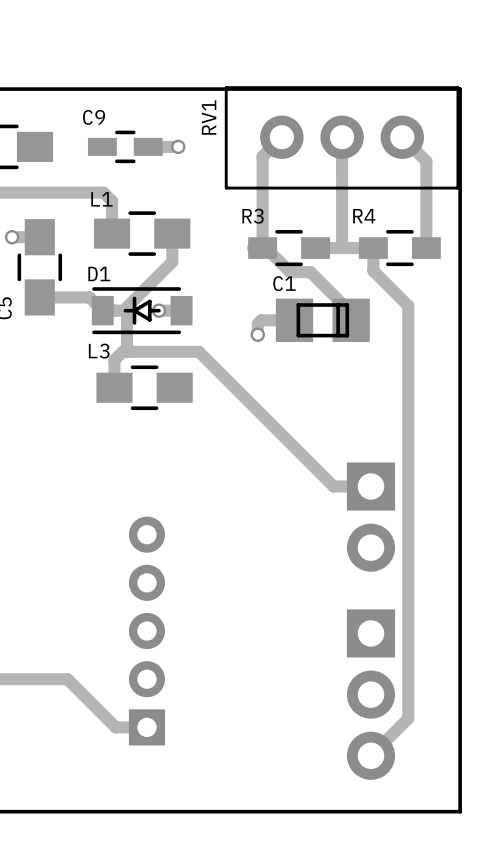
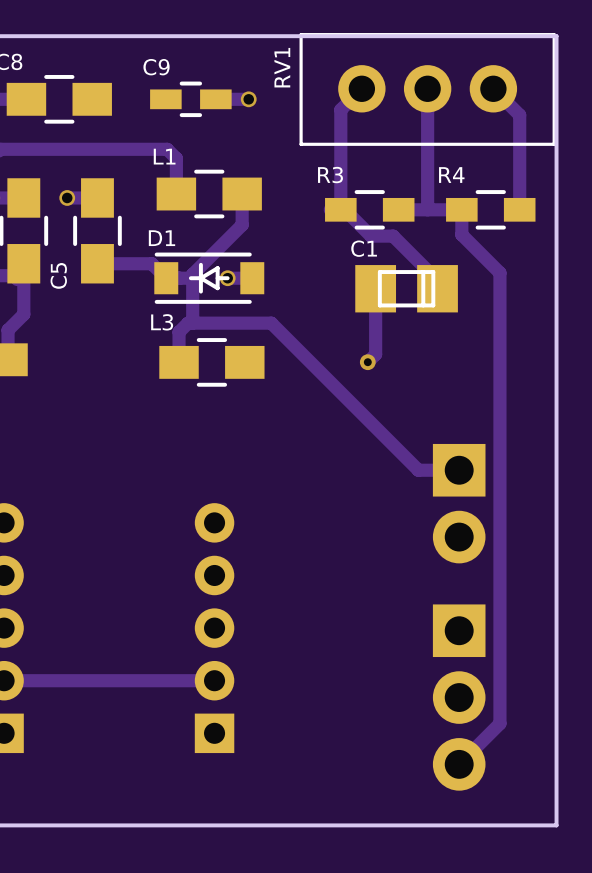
track: (294, 320) (261, 320) (257, 323) (257, 334) -> (375, 288) (375, 354) (367, 362)
via: (257, 334) -> none
via: none -> (367, 362)
track: (67, 679) (115, 727) (146, 727) -> (127, 680) (214, 680)

